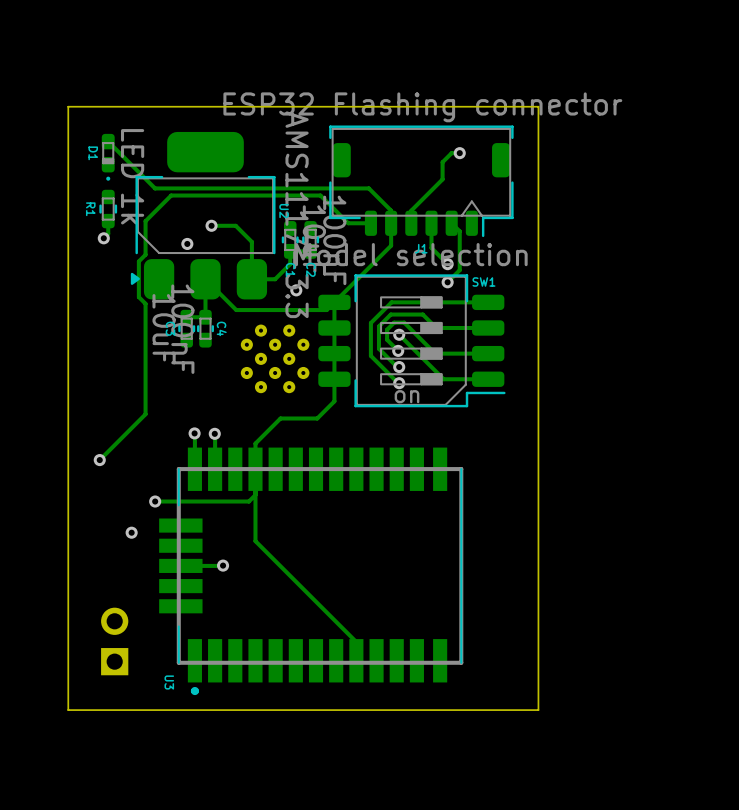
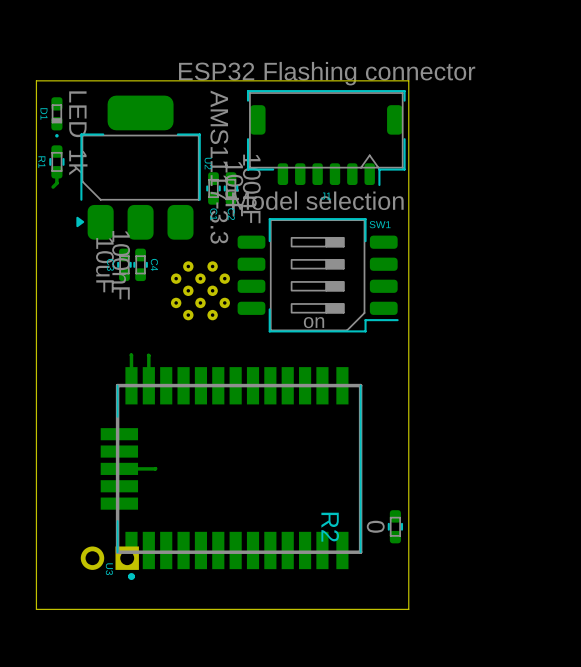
board edge: (538, 106) (68, 106) (68, 710) (538, 710) (538, 106) -> (408, 80) (408, 609) (36, 609) (36, 80) (408, 80)
track: (108, 141) (155, 188) (368, 188) (391, 210) (391, 245) (326, 310) (236, 310) (205, 279) (205, 317) (186, 317) -> none
track: (459, 153) (451, 153) (442, 162) (442, 179) (411, 210) (411, 223) -> none
via: (459, 153) -> none
track: (370, 223) (348, 223) (320, 195) (171, 195) (145, 221) (145, 254) (138, 261) (138, 297) (145, 303) (145, 414) (99, 460) -> none
track: (431, 223) (431, 247) (447, 264) -> none
track: (451, 223) (459, 231) (459, 270) (447, 282) -> none
track: (211, 225) (235, 225) (251, 241) (251, 279) (275, 279) (290, 264) (290, 251) (310, 251) -> none
via: (211, 225) -> none
via: (103, 238) -> none
via: (187, 243) -> none
via: (447, 264) -> none
via: (447, 282) -> none
via: (296, 290) -> none
track: (334, 302) (334, 401) (317, 418) (280, 418) (255, 443) (255, 541) (356, 642) (356, 660) -> none
track: (488, 302) (391, 302) (370, 323) (370, 355) (399, 383) -> none
track: (488, 327) (436, 327) (422, 314) (390, 314) (378, 326) (378, 348) (399, 367) -> none
track: (399, 334) (443, 379) (488, 379) -> none
via: (399, 334) -> none
track: (398, 350) (387, 339) (387, 329) (394, 322) (404, 322) (435, 353) (488, 353) -> none
via: (398, 350) -> none
via: (399, 367) -> none
via: (399, 383) -> none
via: (194, 433) -> none
via: (214, 433) -> none
via: (99, 460) -> none
track: (255, 494) (248, 501) (155, 501) -> none
via: (155, 501) -> none
via: (131, 532) -> none
via: (223, 565) -> none
R2: none -> 0 (395, 526)
part rotation: 0° (114, 641) -> 90° counterclockwise (109, 558)
part position: (114, 641) -> (109, 558)

